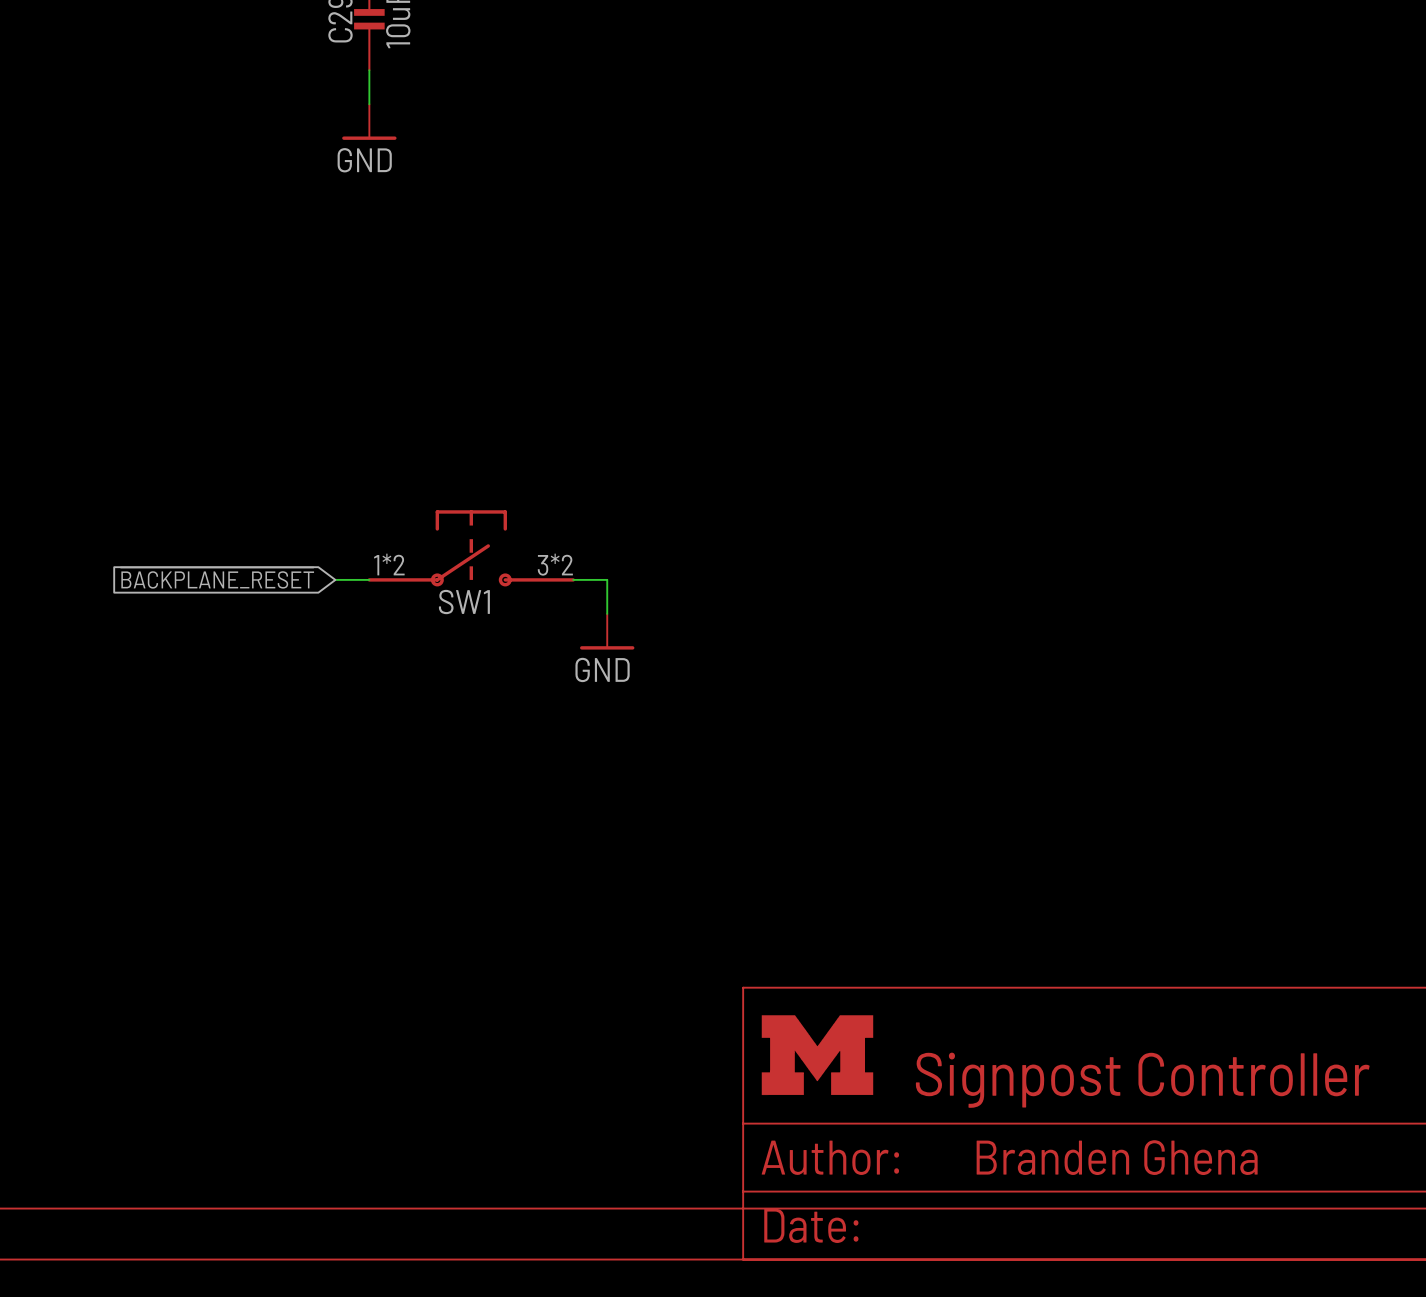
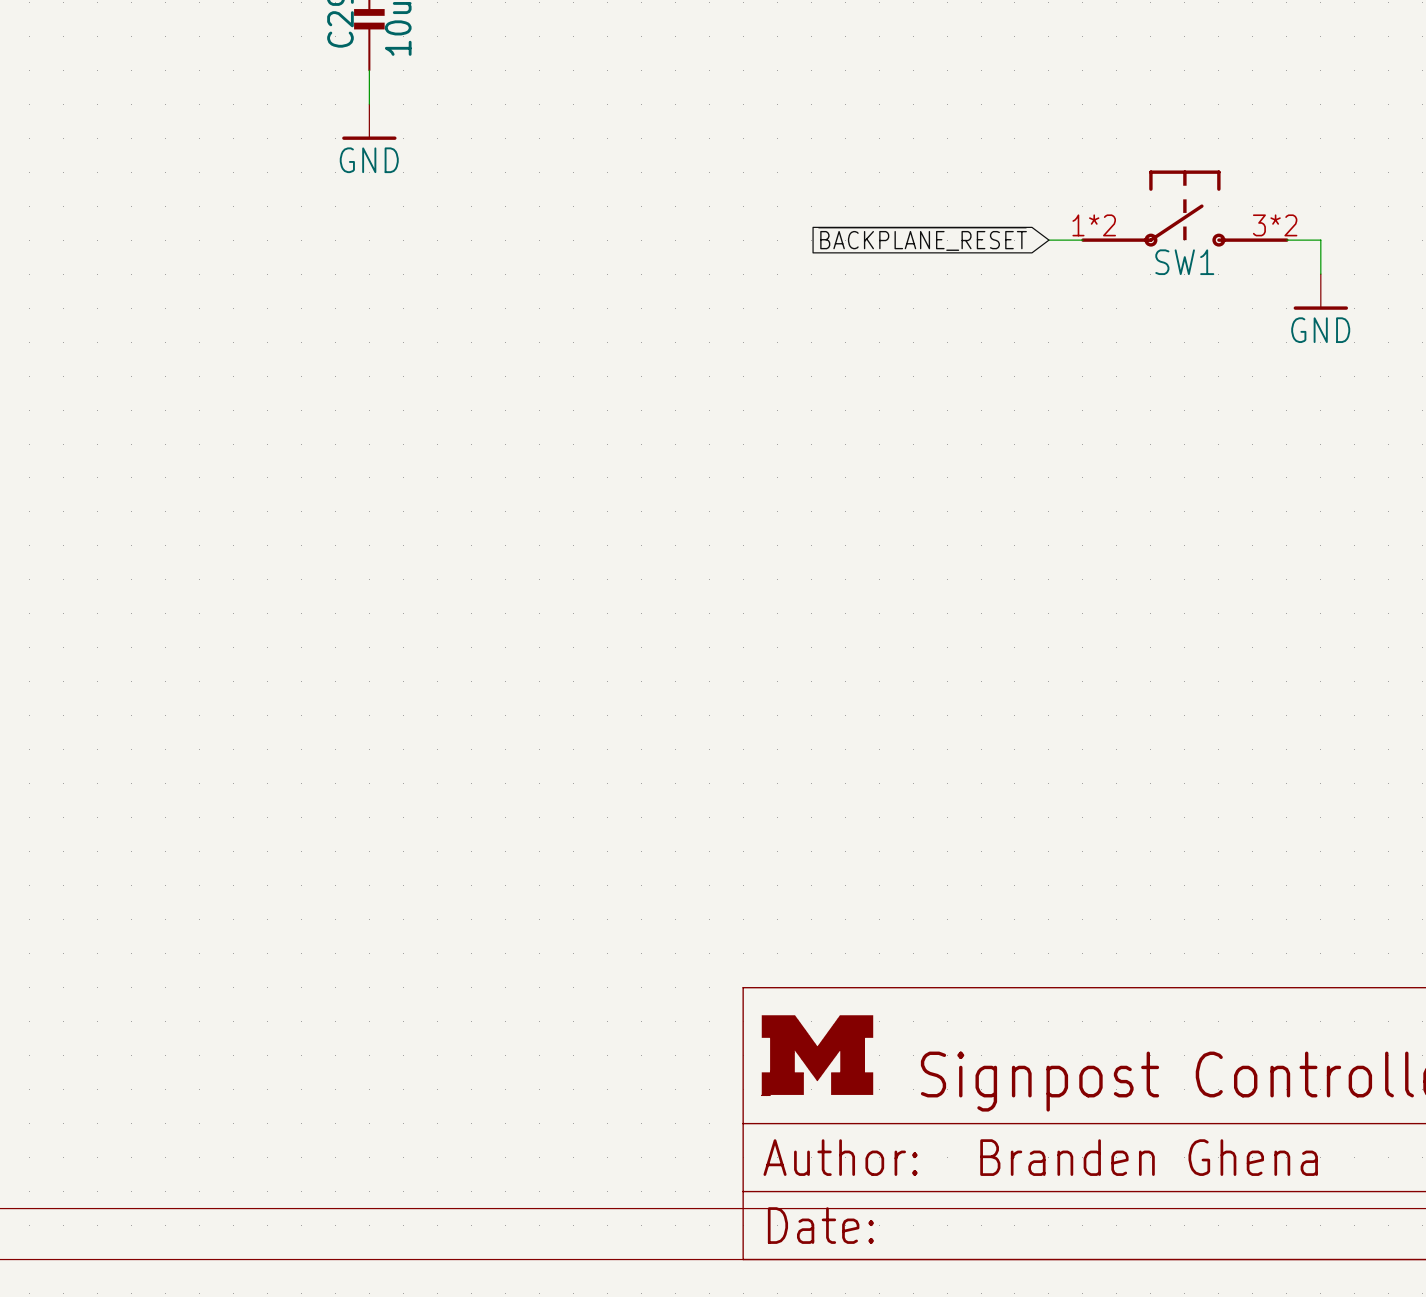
global label: none -> ~{BACKPLANE_RESET} (922, 238)
wire: none -> (1048, 240) (1082, 240)
wire: none -> (1286, 240) (1320, 240) (1320, 274)
power symbol: none -> GND (1320, 291)
SW1 position: (471, 548) -> (1184, 208)
global label: ~{BACKPLANE_RESET} (217, 578) -> none
wire: (335, 579) (369, 579) -> none
wire: (573, 579) (607, 579) (607, 613) -> none
power symbol: GND (607, 631) -> none

